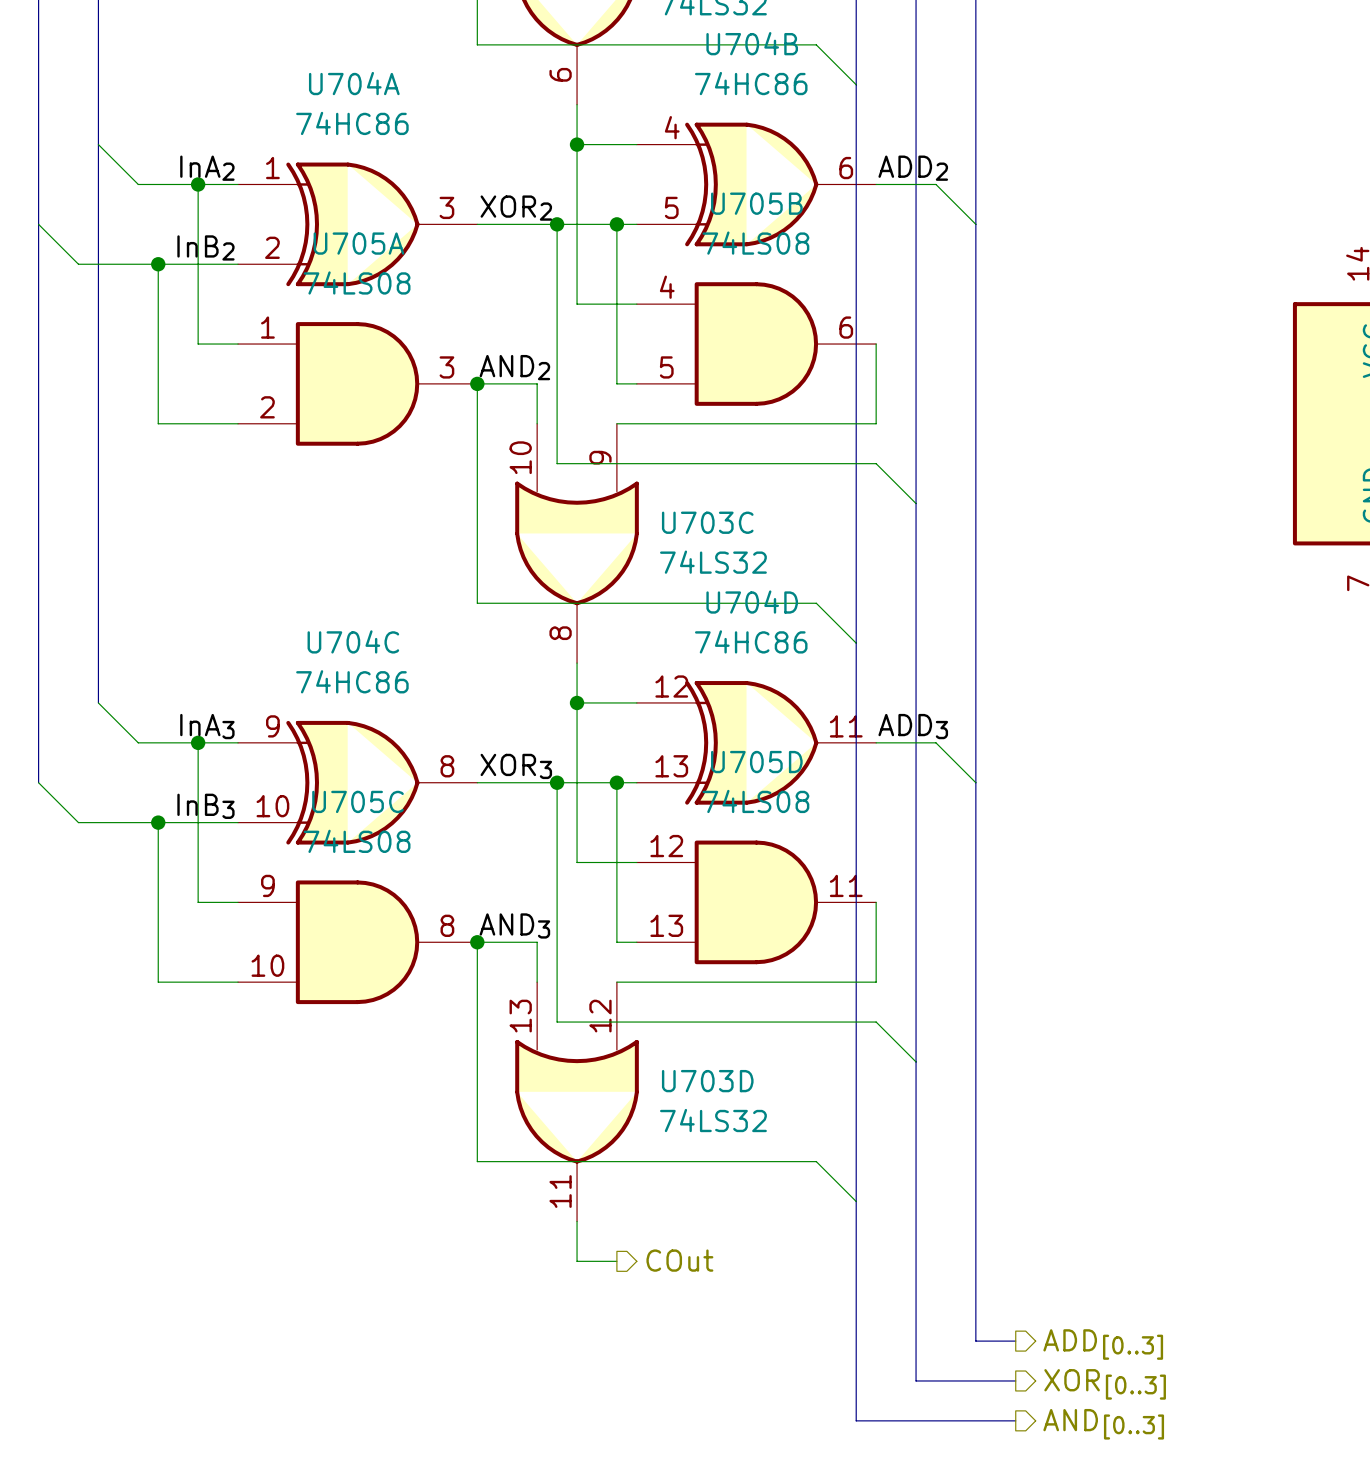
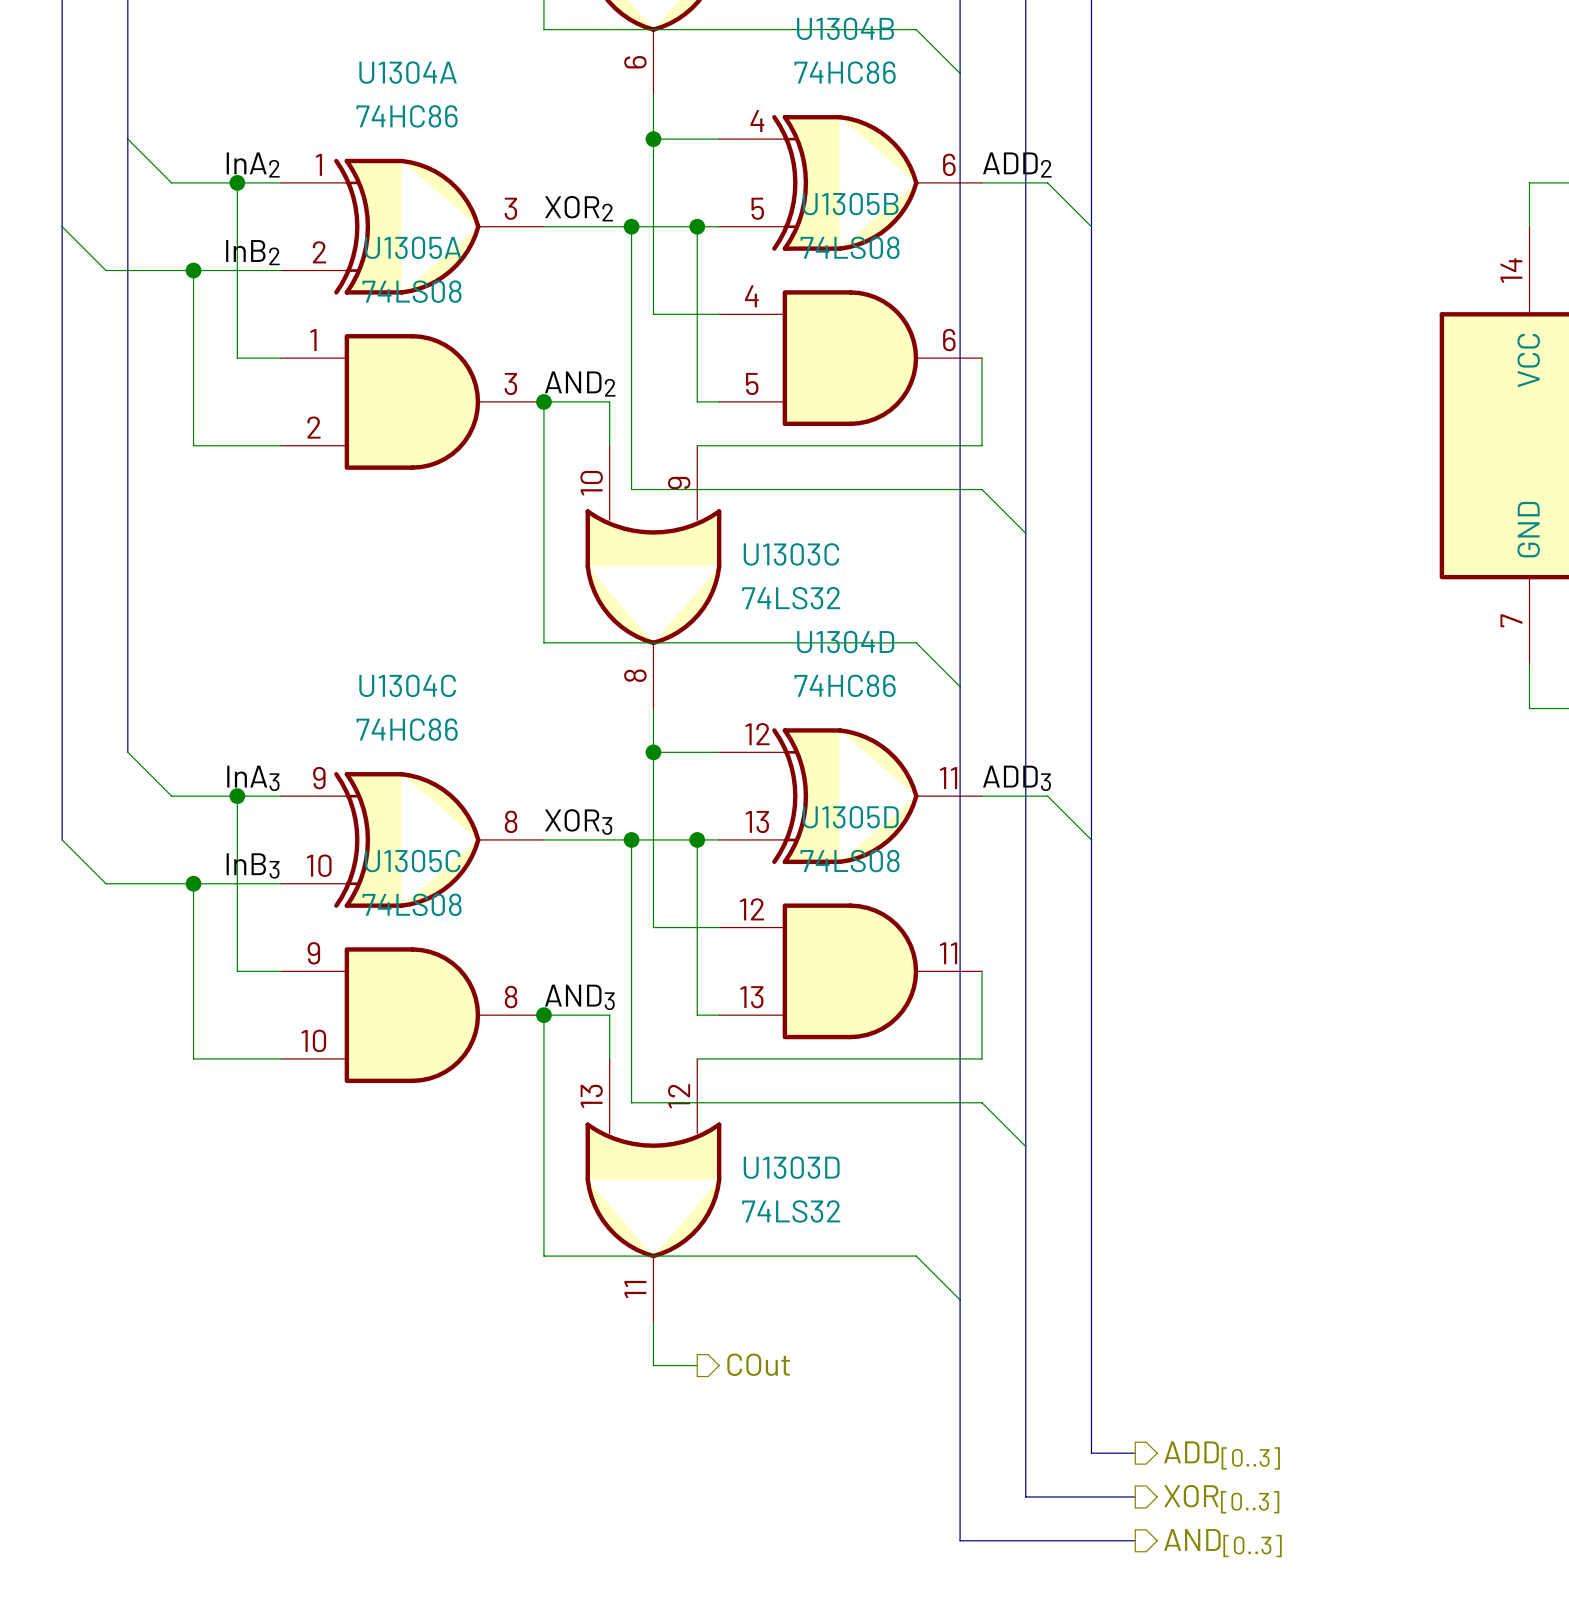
U704B name: U704B (752, 43) -> U1304B (845, 28)
U704A name: U704A (354, 83) -> U1304A (408, 72)
U705B name: U705B (756, 203) -> U1305B (850, 204)
U705A name: U705A (358, 243) -> U1305A (413, 247)
U703C name: U703C (707, 522) -> U1303C (791, 554)
U704D name: U704D (752, 602) -> U1304D (845, 642)
U704C name: U704C (353, 641) -> U1304C (407, 685)
U705D name: U705D (756, 762) -> U1305D (850, 817)
U705C name: U705C (358, 801) -> U1305C (412, 861)
U703D name: U703D (707, 1081) -> U1303D (791, 1167)

